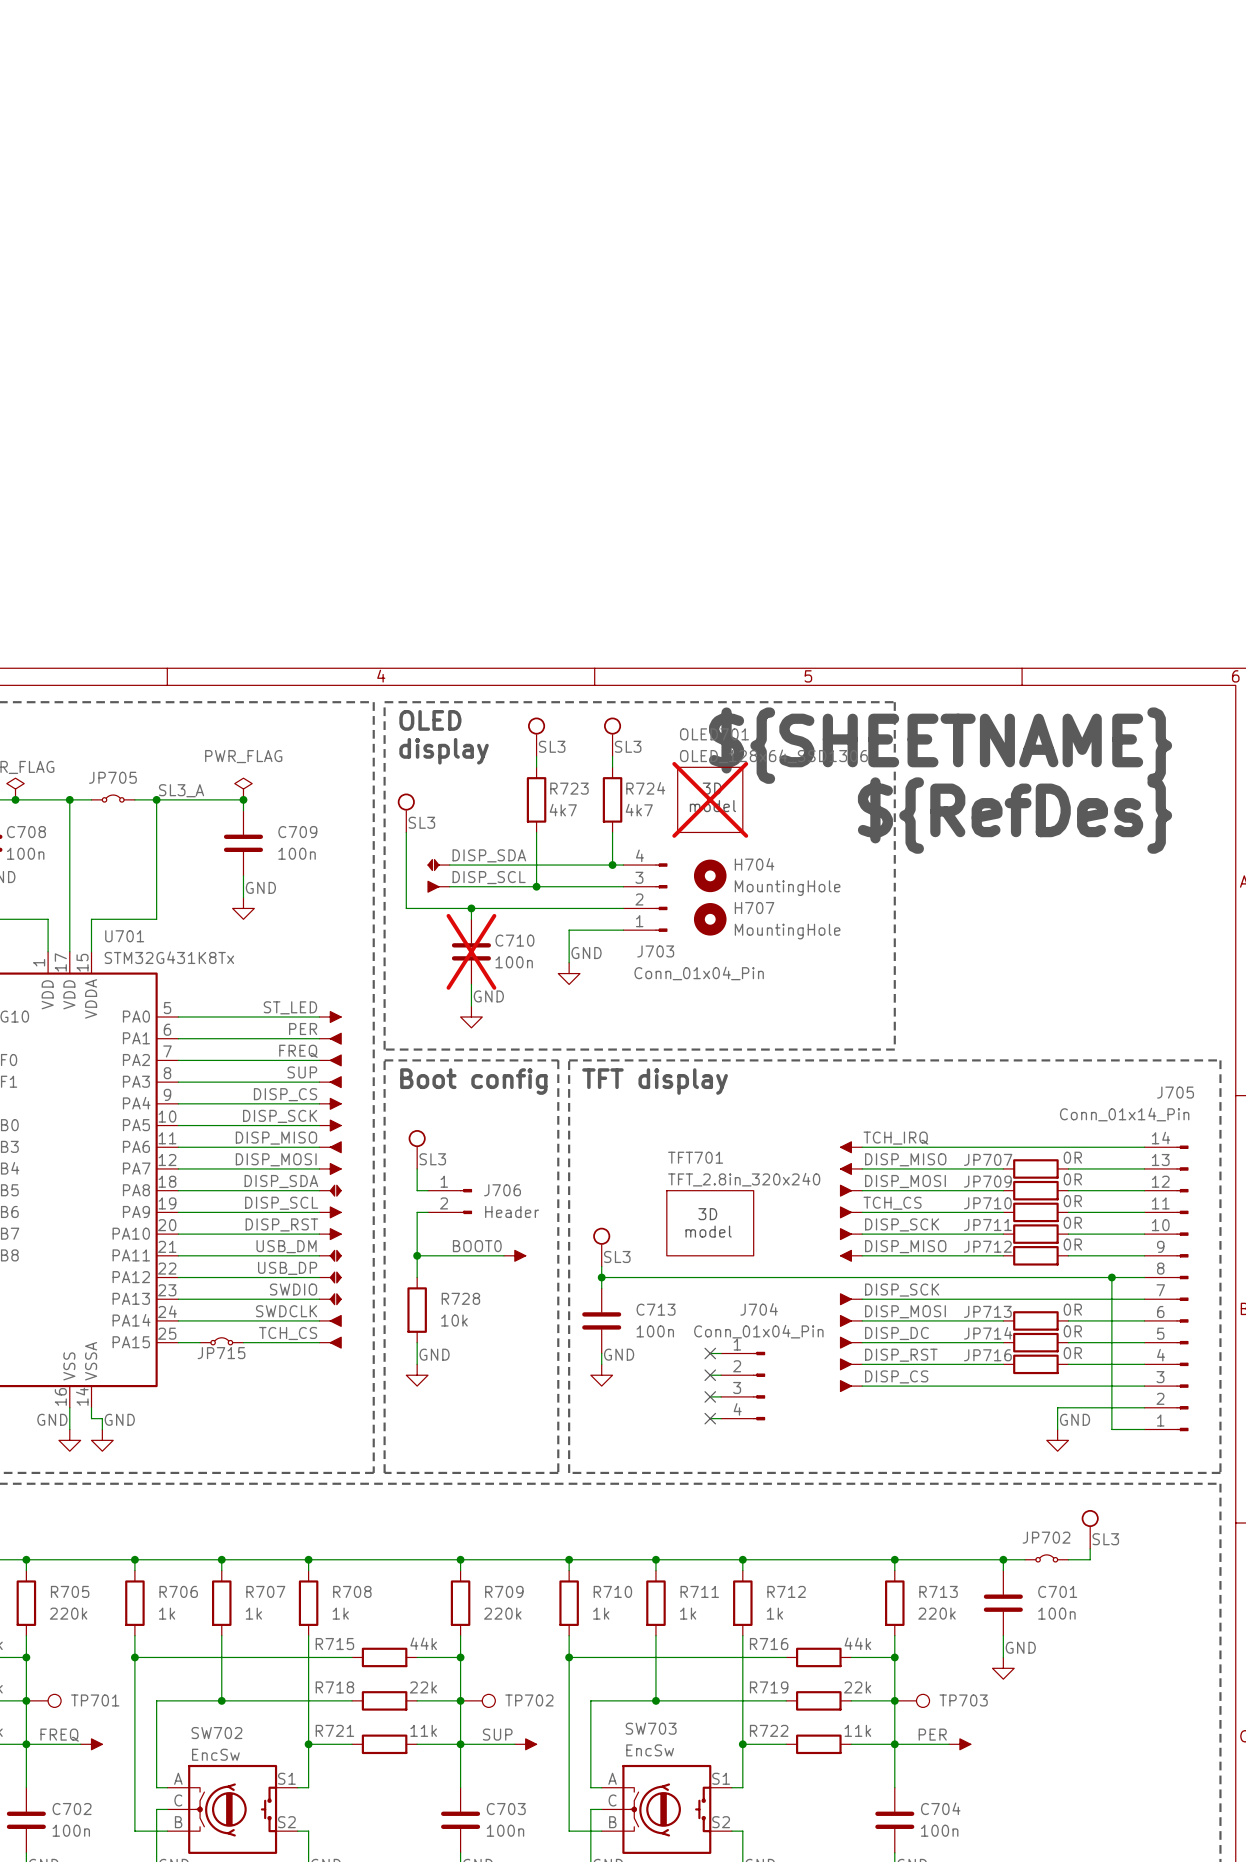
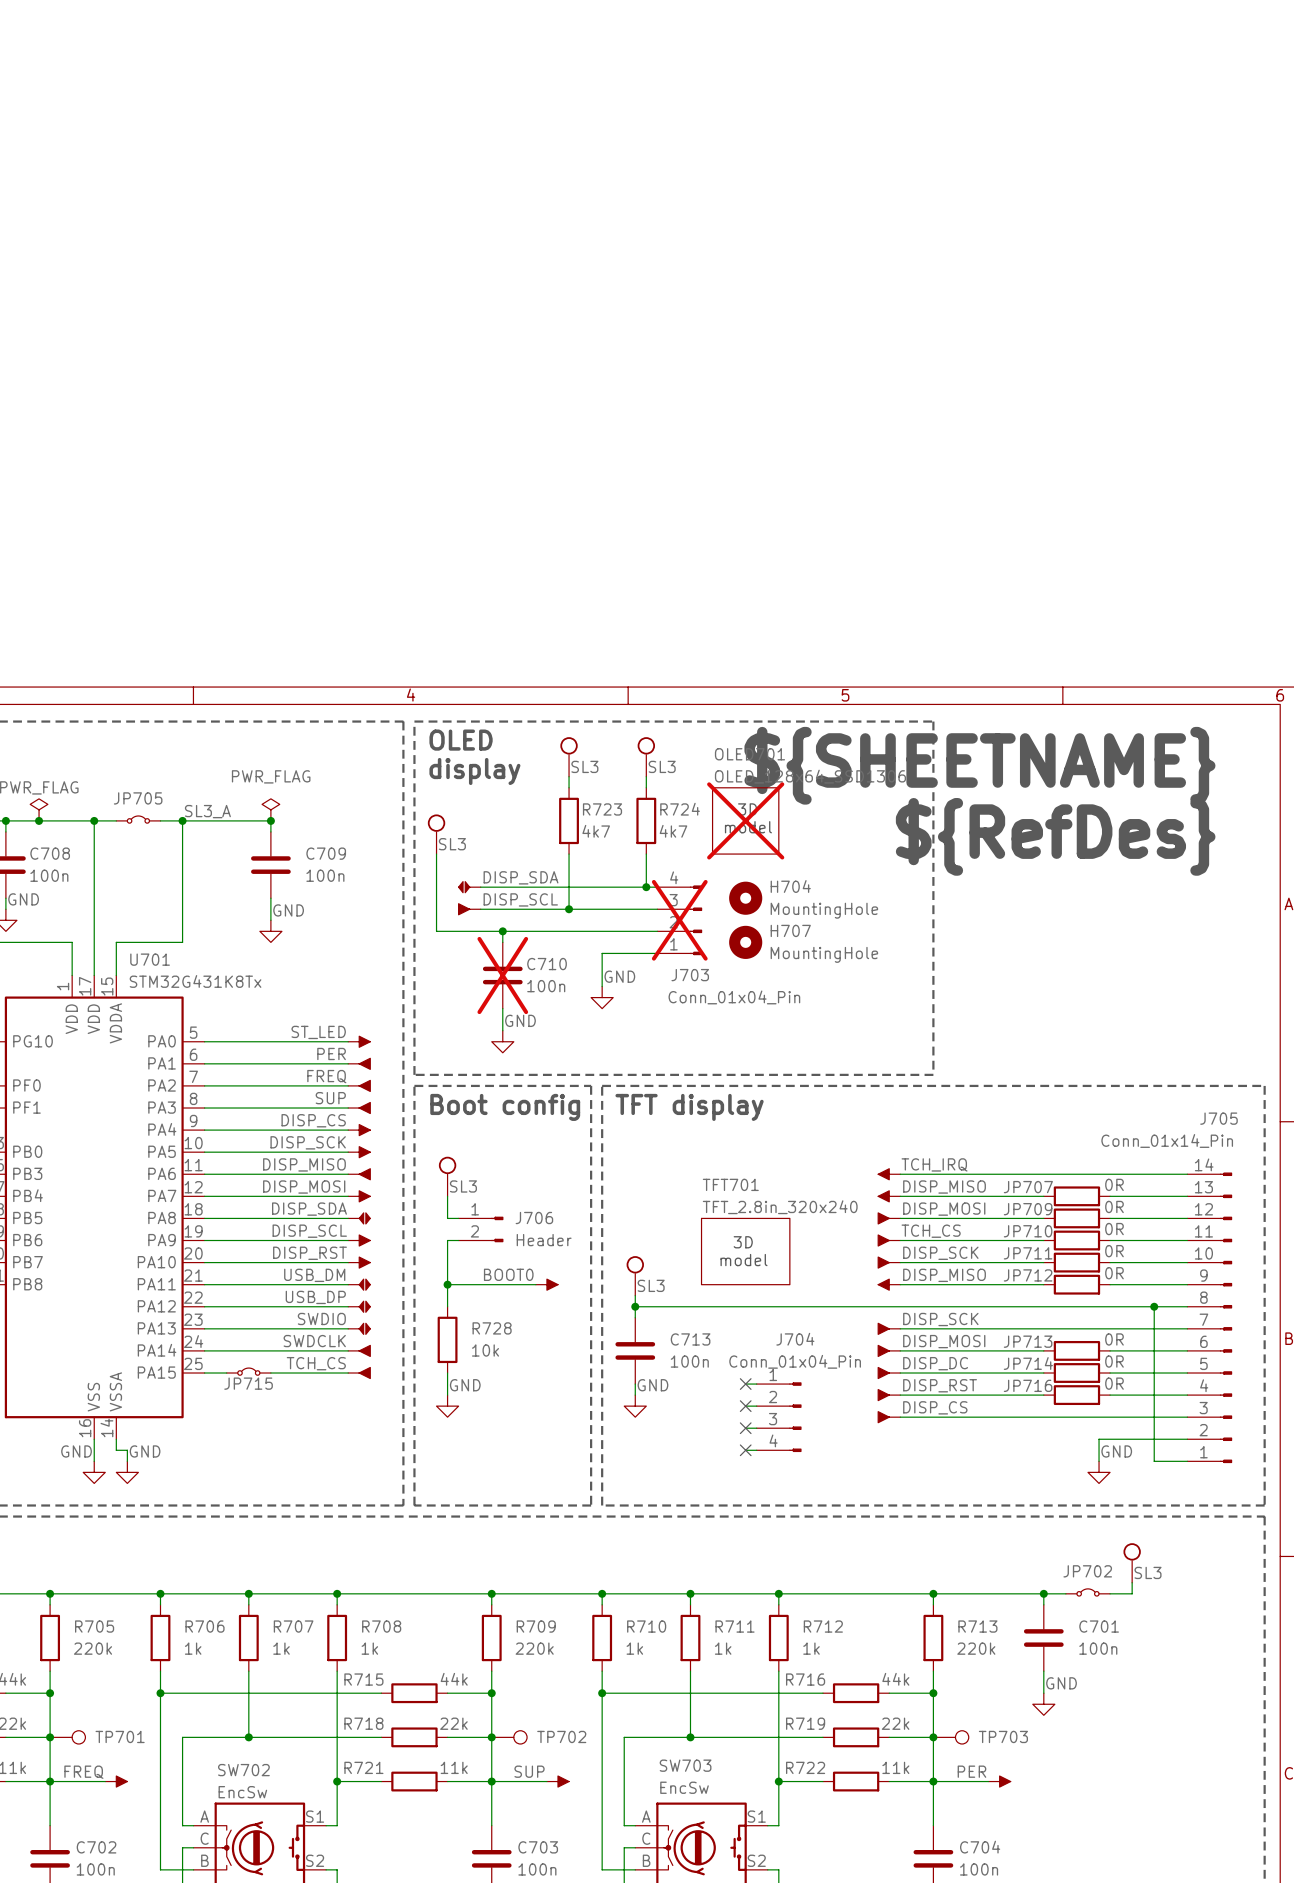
J703 do-not-place cross: none -> (679, 920)

